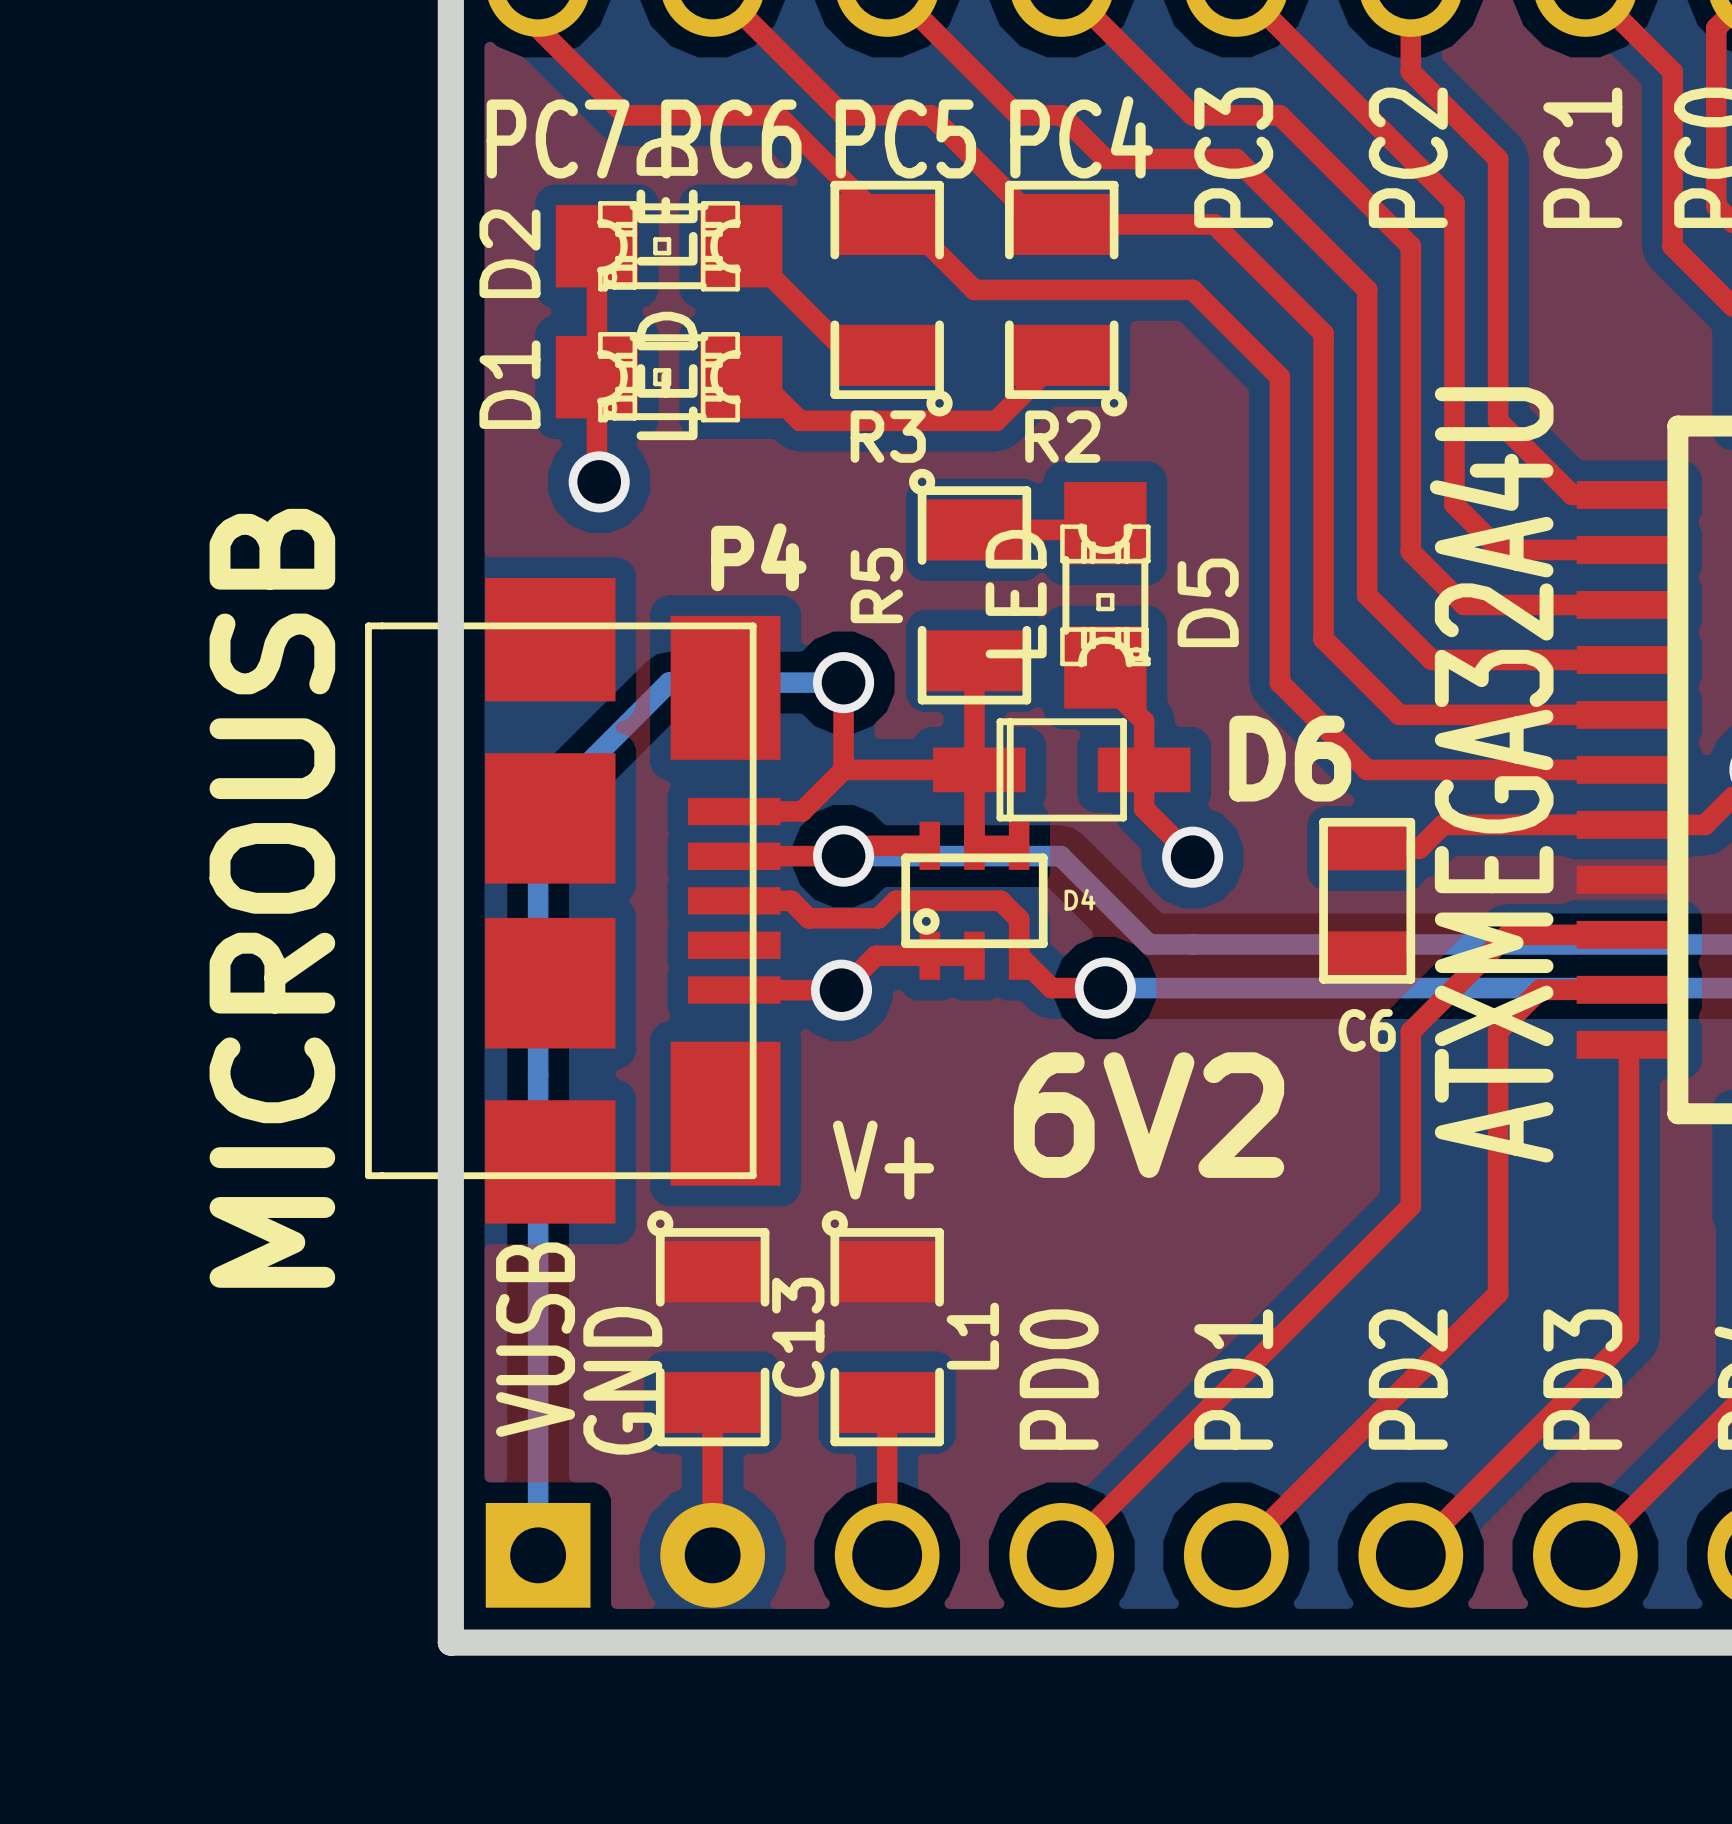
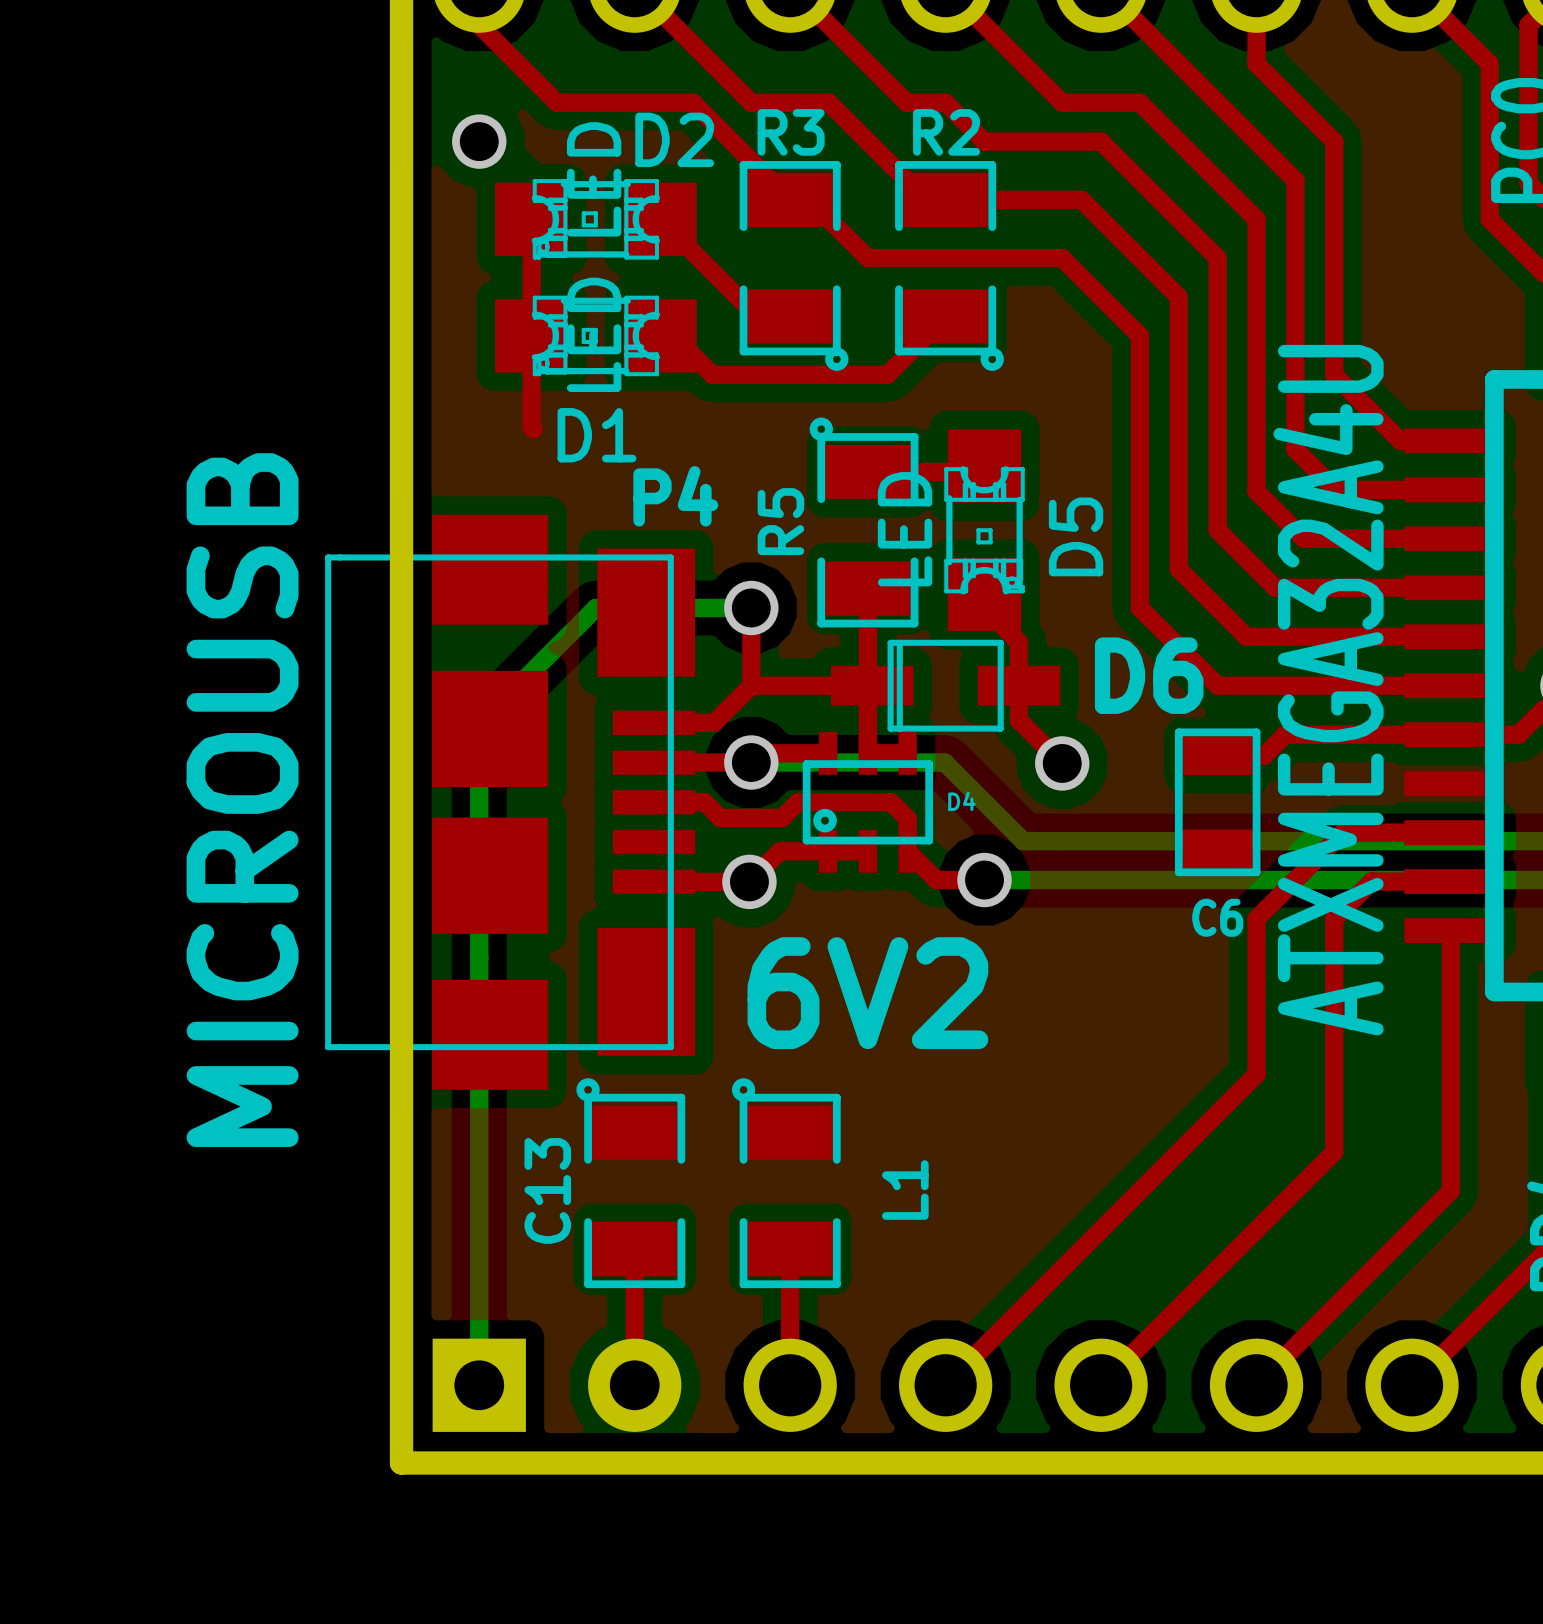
text: PC4 (1081, 137) -> none
text: PC7 (558, 138) -> none
text: PC6 (731, 138) -> none
text: PC5 (905, 138) -> none
text: PC3 (1233, 157) -> none
text: PC2 (1408, 157) -> none
text: PC1 (1582, 157) -> none
D2 name rotation: 0° (509, 253) -> 90° clockwise (674, 139)
D2 name position: D2 (509, 253) -> D2 (674, 139)
D1 name rotation: 0° (509, 384) -> 90° clockwise (596, 435)
D1 name position: D1 (509, 384) -> D1 (596, 435)
R3 name position: R3 (888, 436) -> R3 (791, 132)
R2 name position: R2 (1062, 436) -> R2 (946, 132)
via position: (599, 481) -> (479, 141)
D6 value position: 6V2 (1149, 1115) -> 6V2 (867, 993)
text: V+ (883, 1160) -> none
L1 name position: L1 (972, 1336) -> L1 (905, 1190)
C13 name position: C13 (798, 1337) -> C13 (547, 1190)
text: VUSB (535, 1339) -> none
text: PD0 (1059, 1379) -> none
text: PD1 (1233, 1379) -> none
text: PD2 (1408, 1379) -> none
text: PD3 (1582, 1379) -> none
text: GND (622, 1380) -> none

